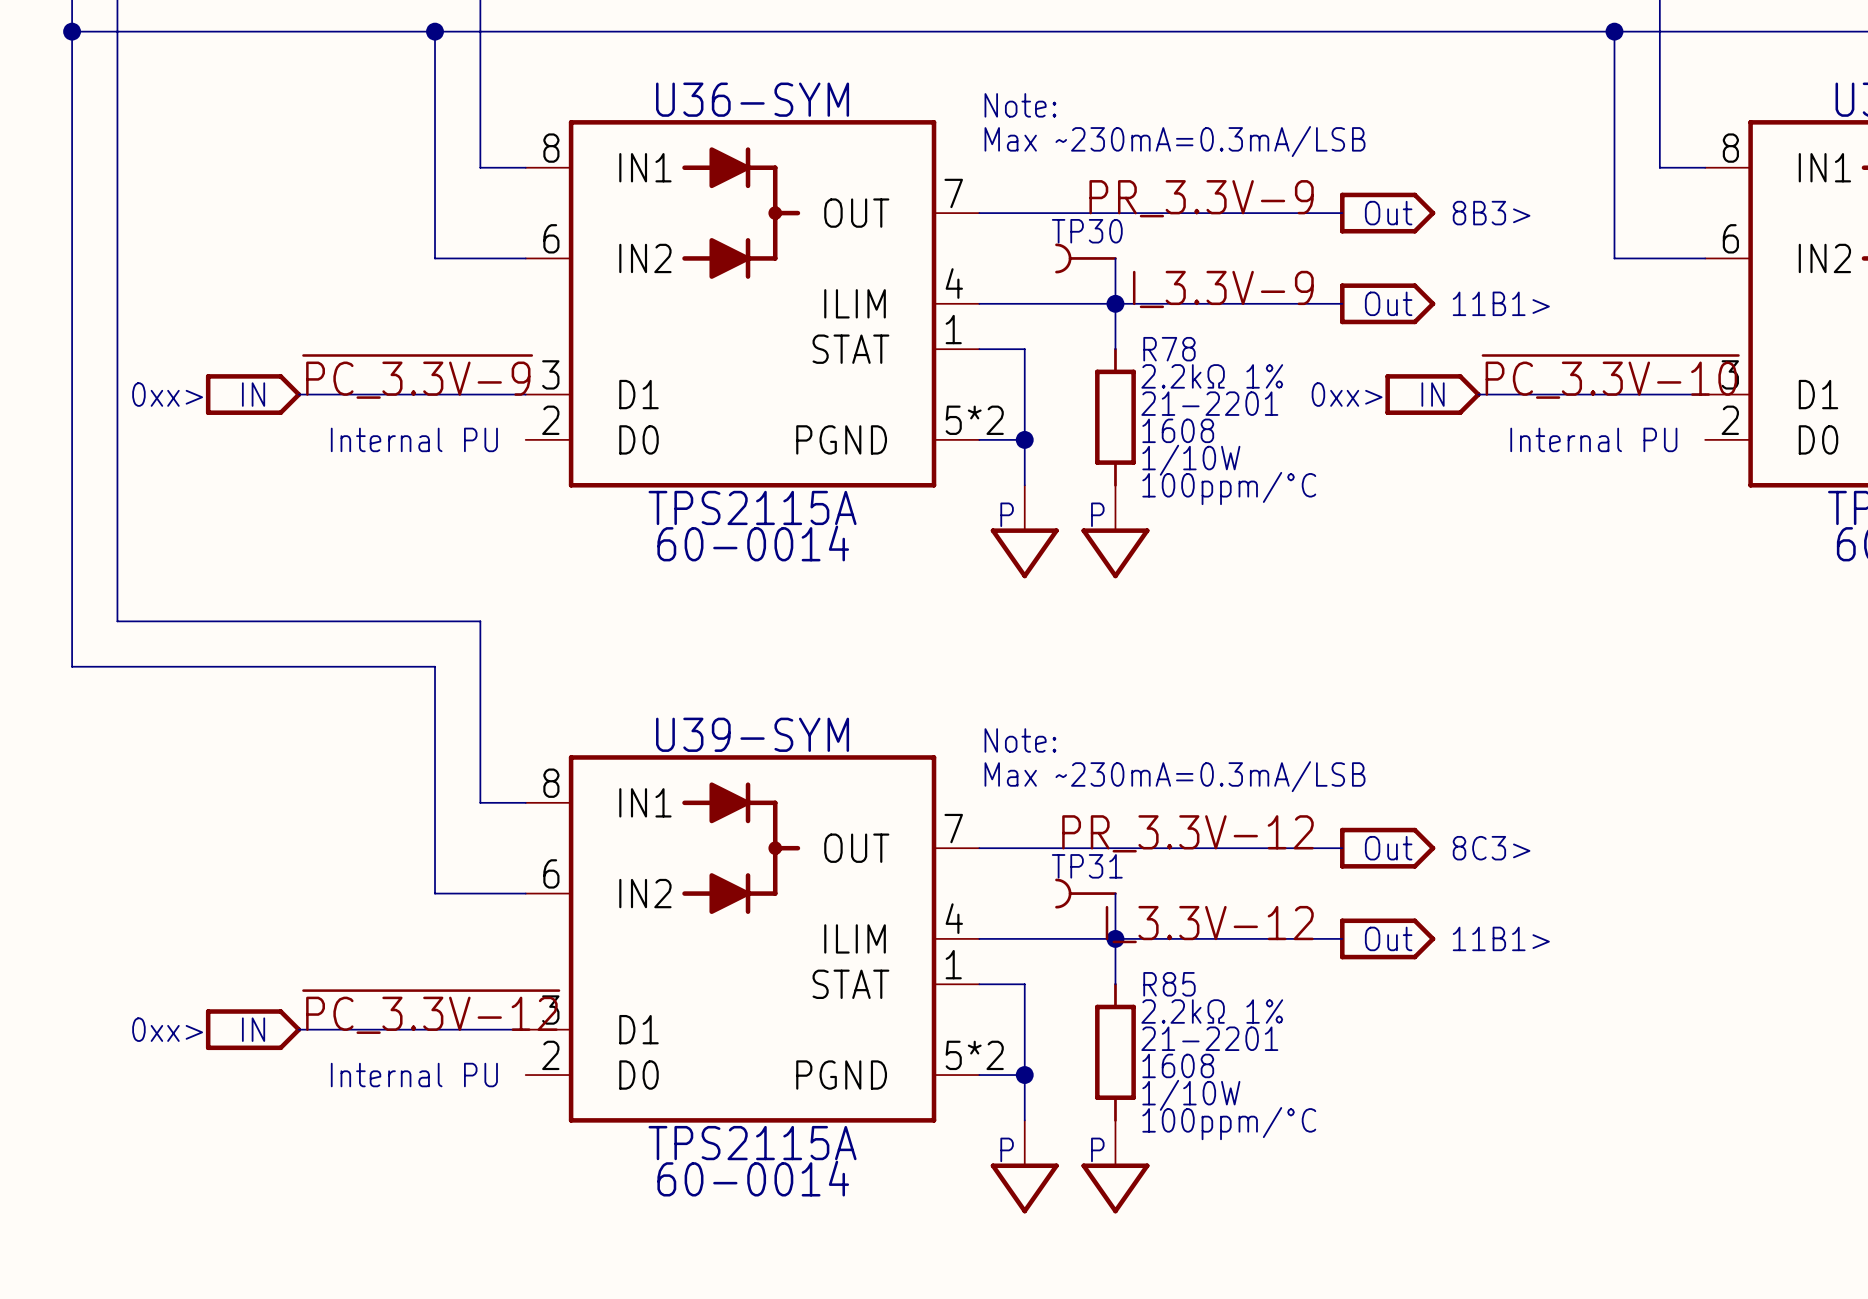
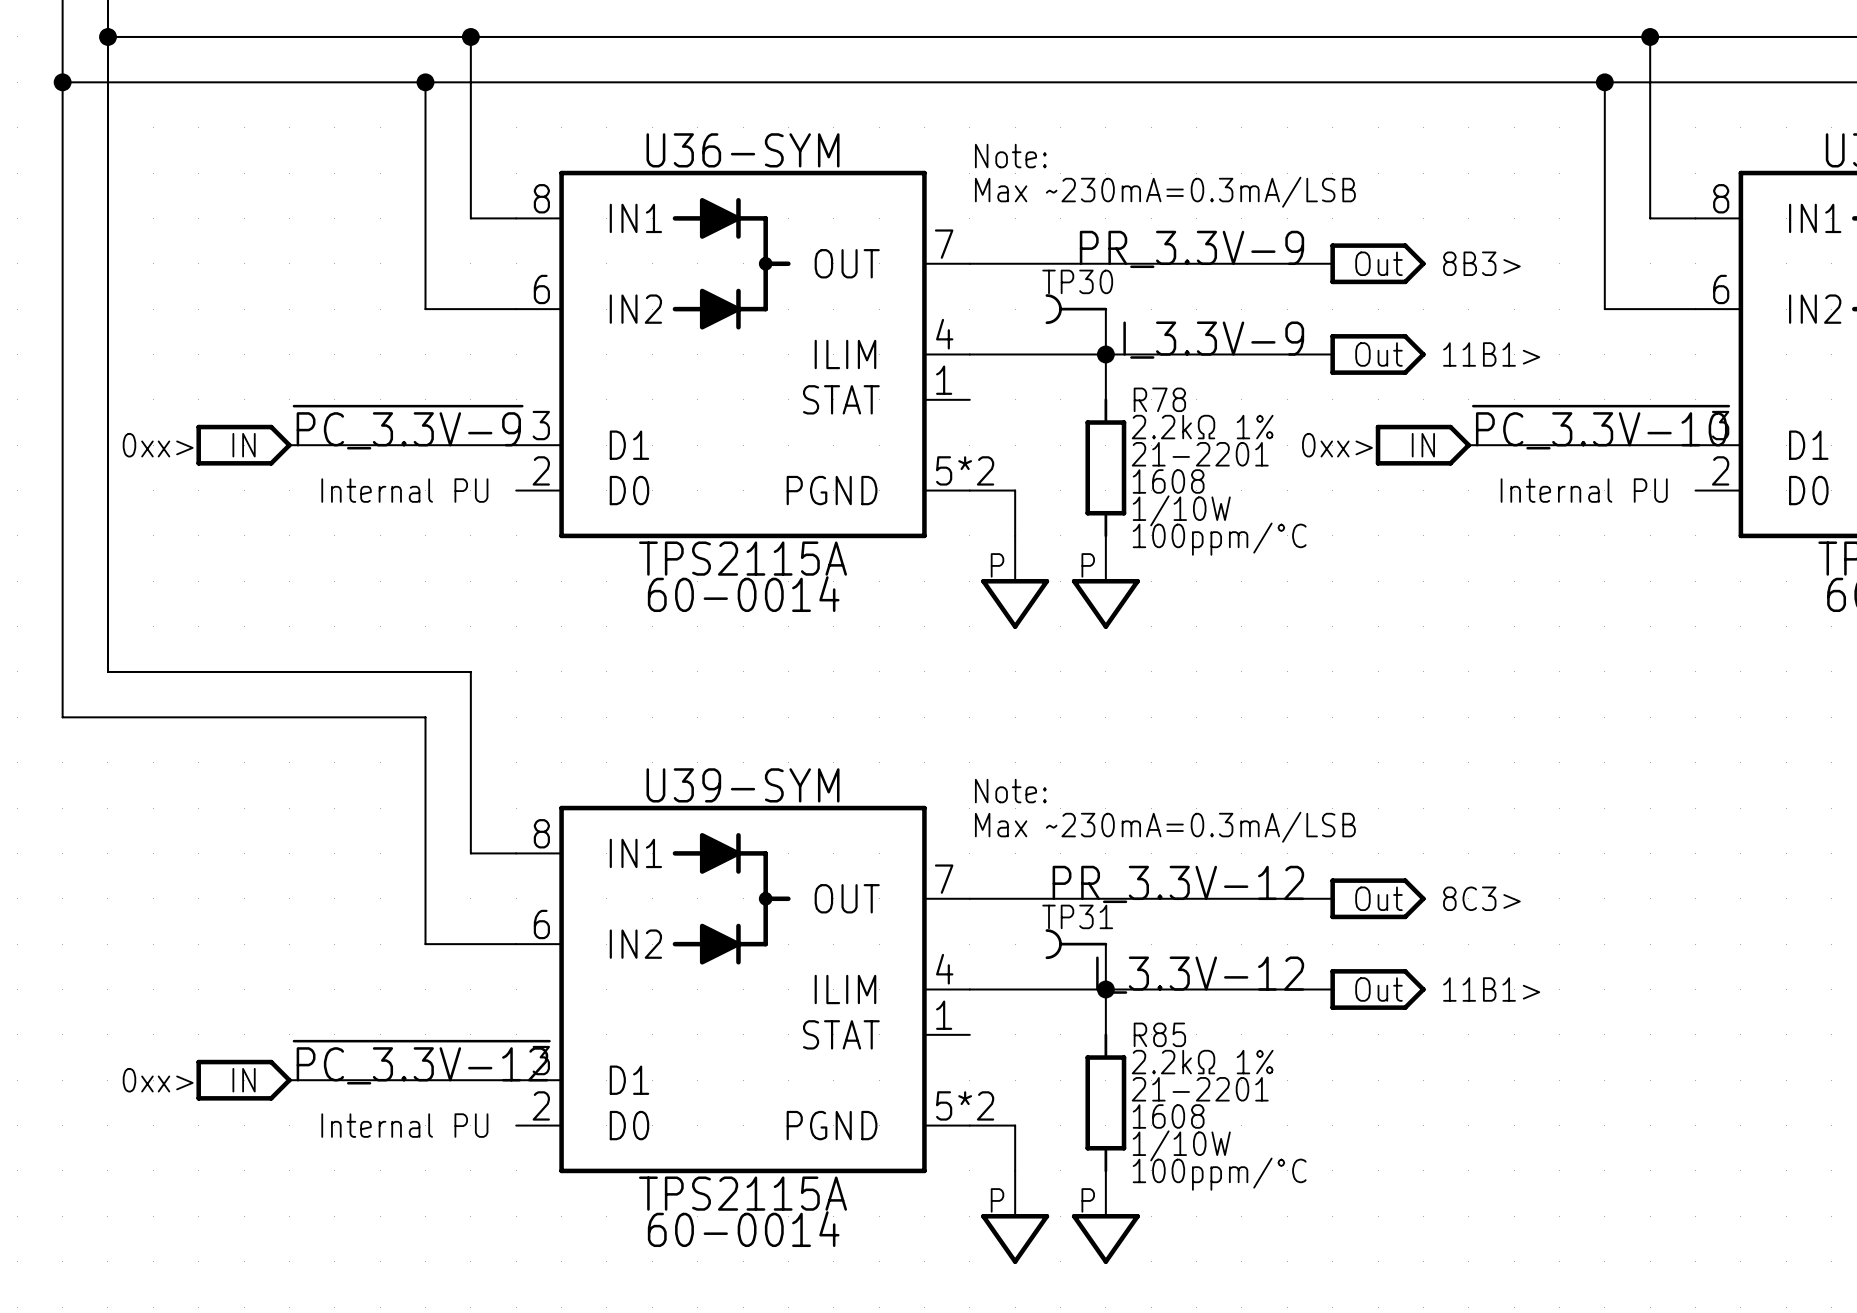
wire: (979, 349) (1024, 349) (1024, 439) -> none
junction: (1024, 439) -> none
wire: (979, 984) (1024, 984) (1024, 1075) -> none
junction: (1024, 1075) -> none

